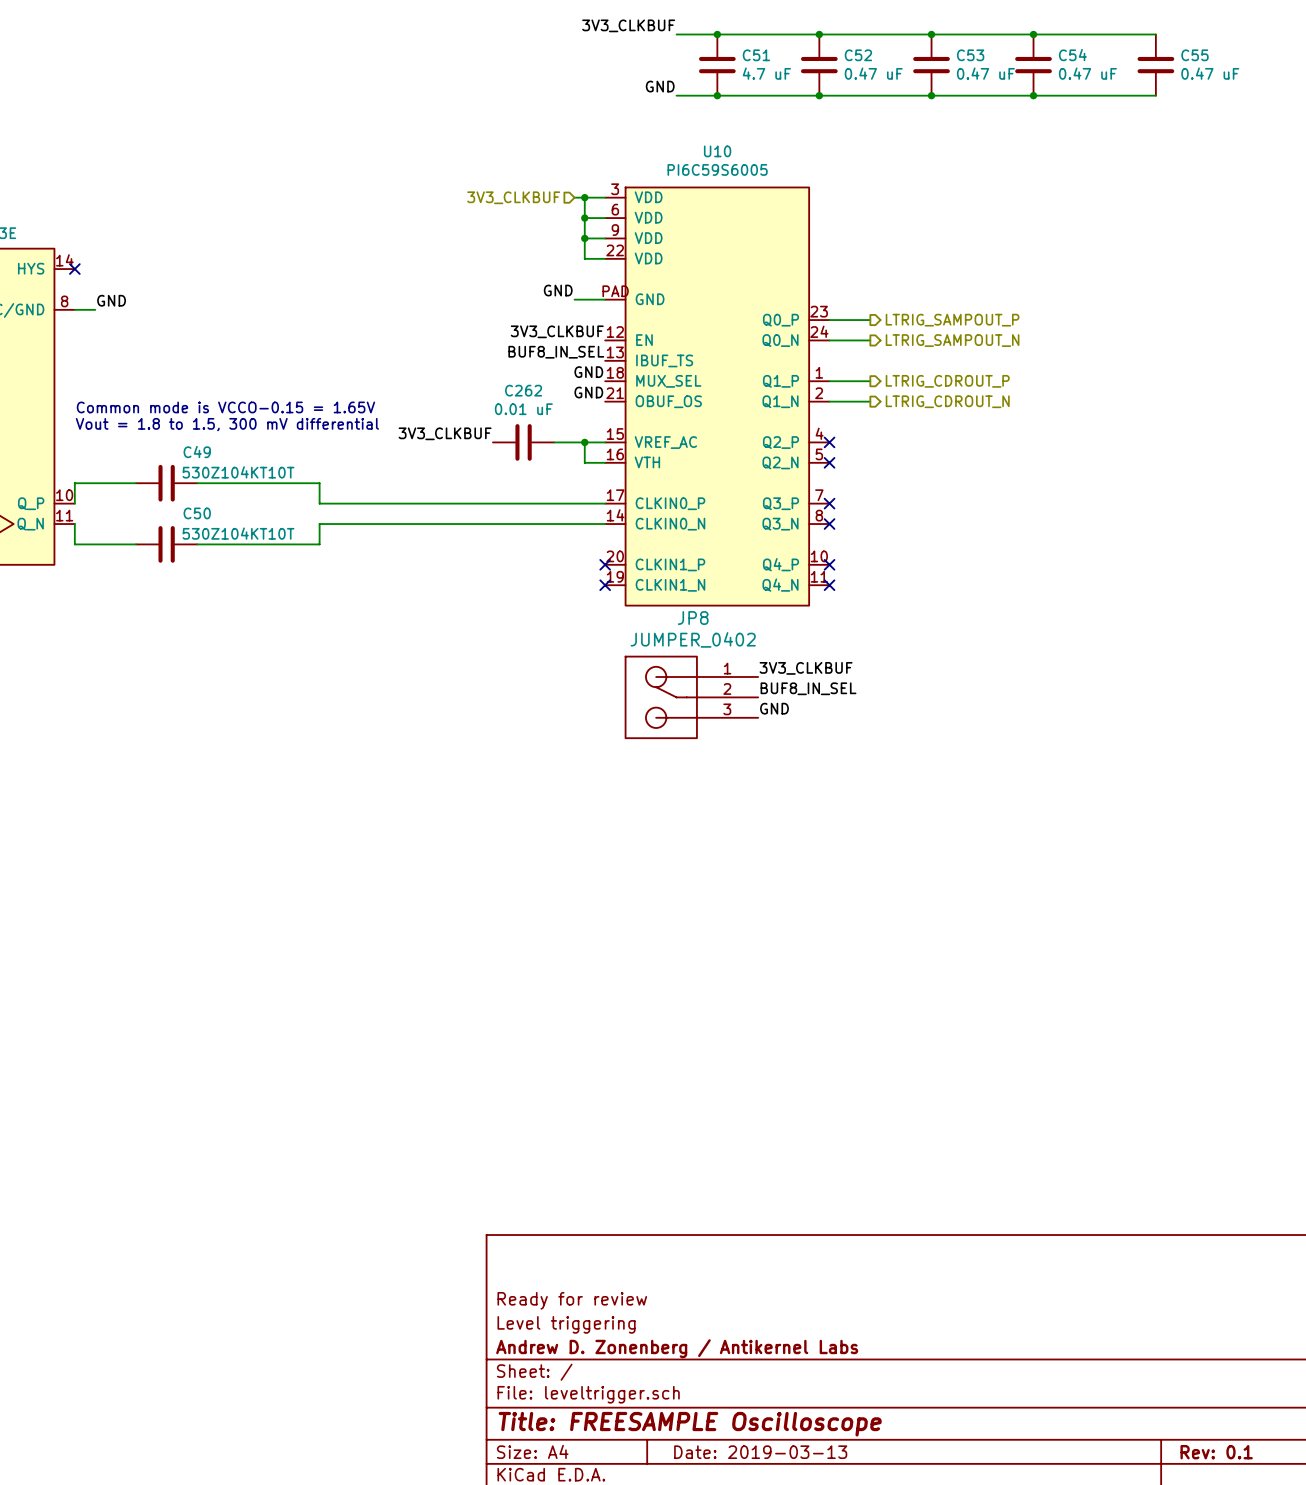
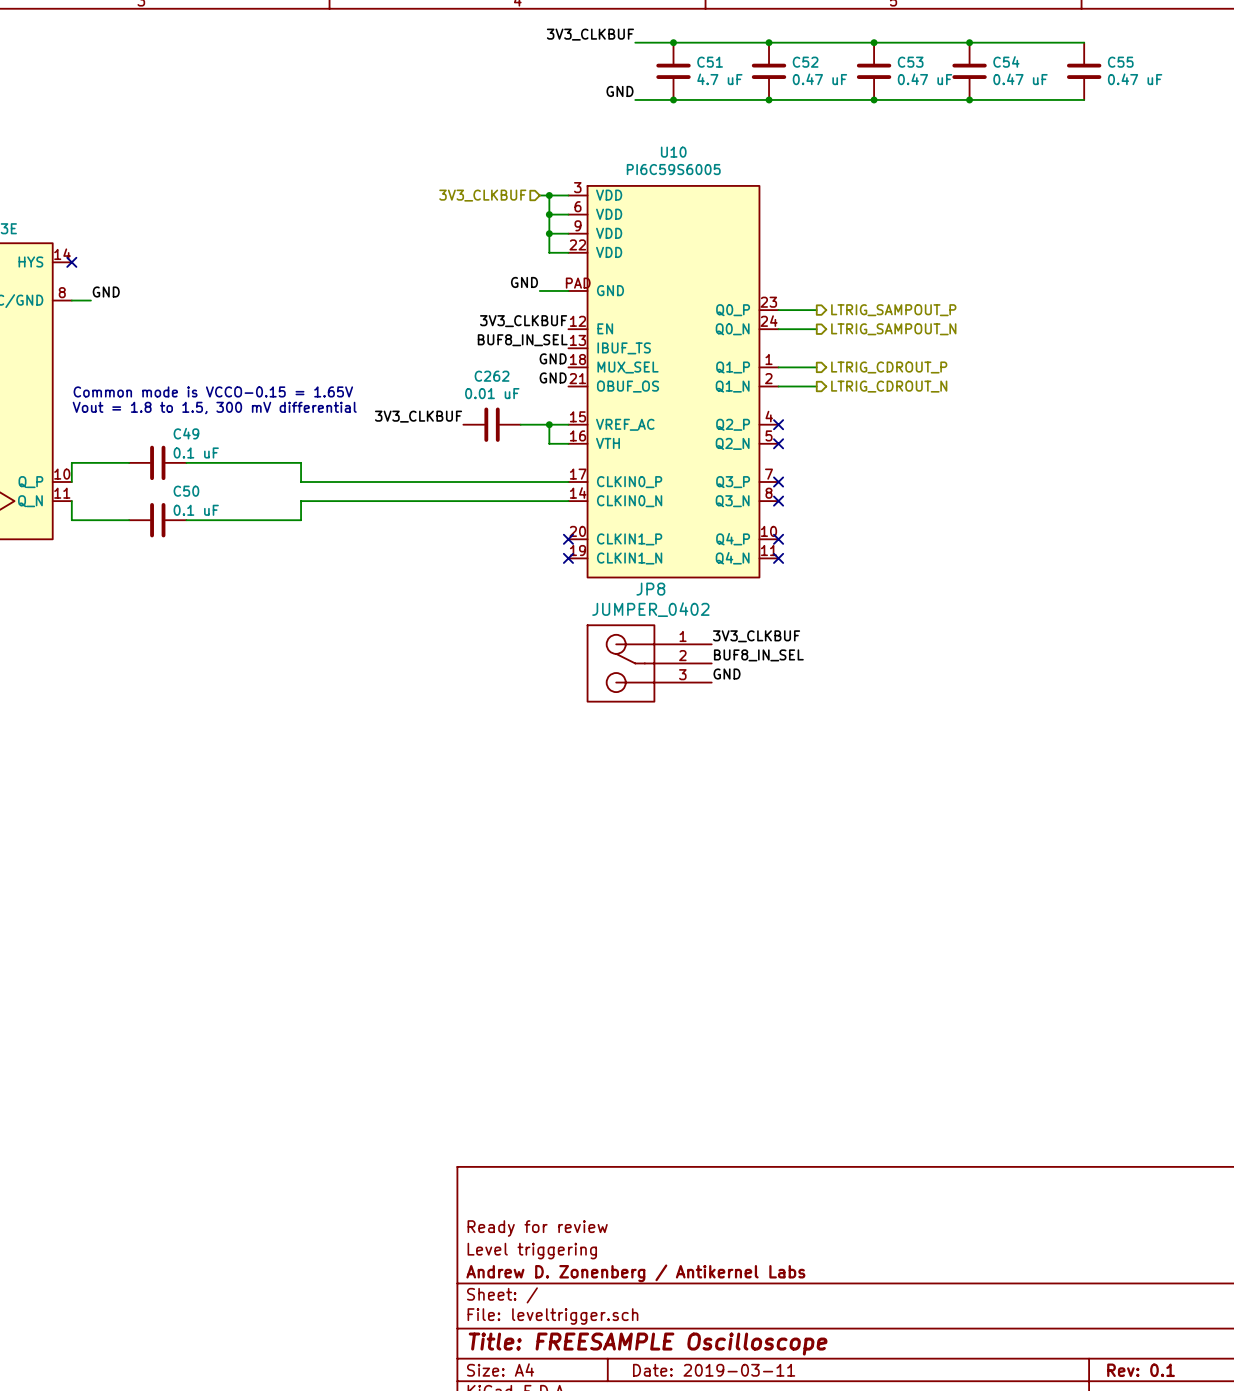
C49 value: 530Z104KT10T (238, 472) -> 0.1 uF (196, 452)
C50 value: 530Z104KT10T (238, 533) -> 0.1 uF (196, 510)
title block: Date: 2019-03-13 (760, 1452) -> Date: 2019-03-11 (714, 1370)

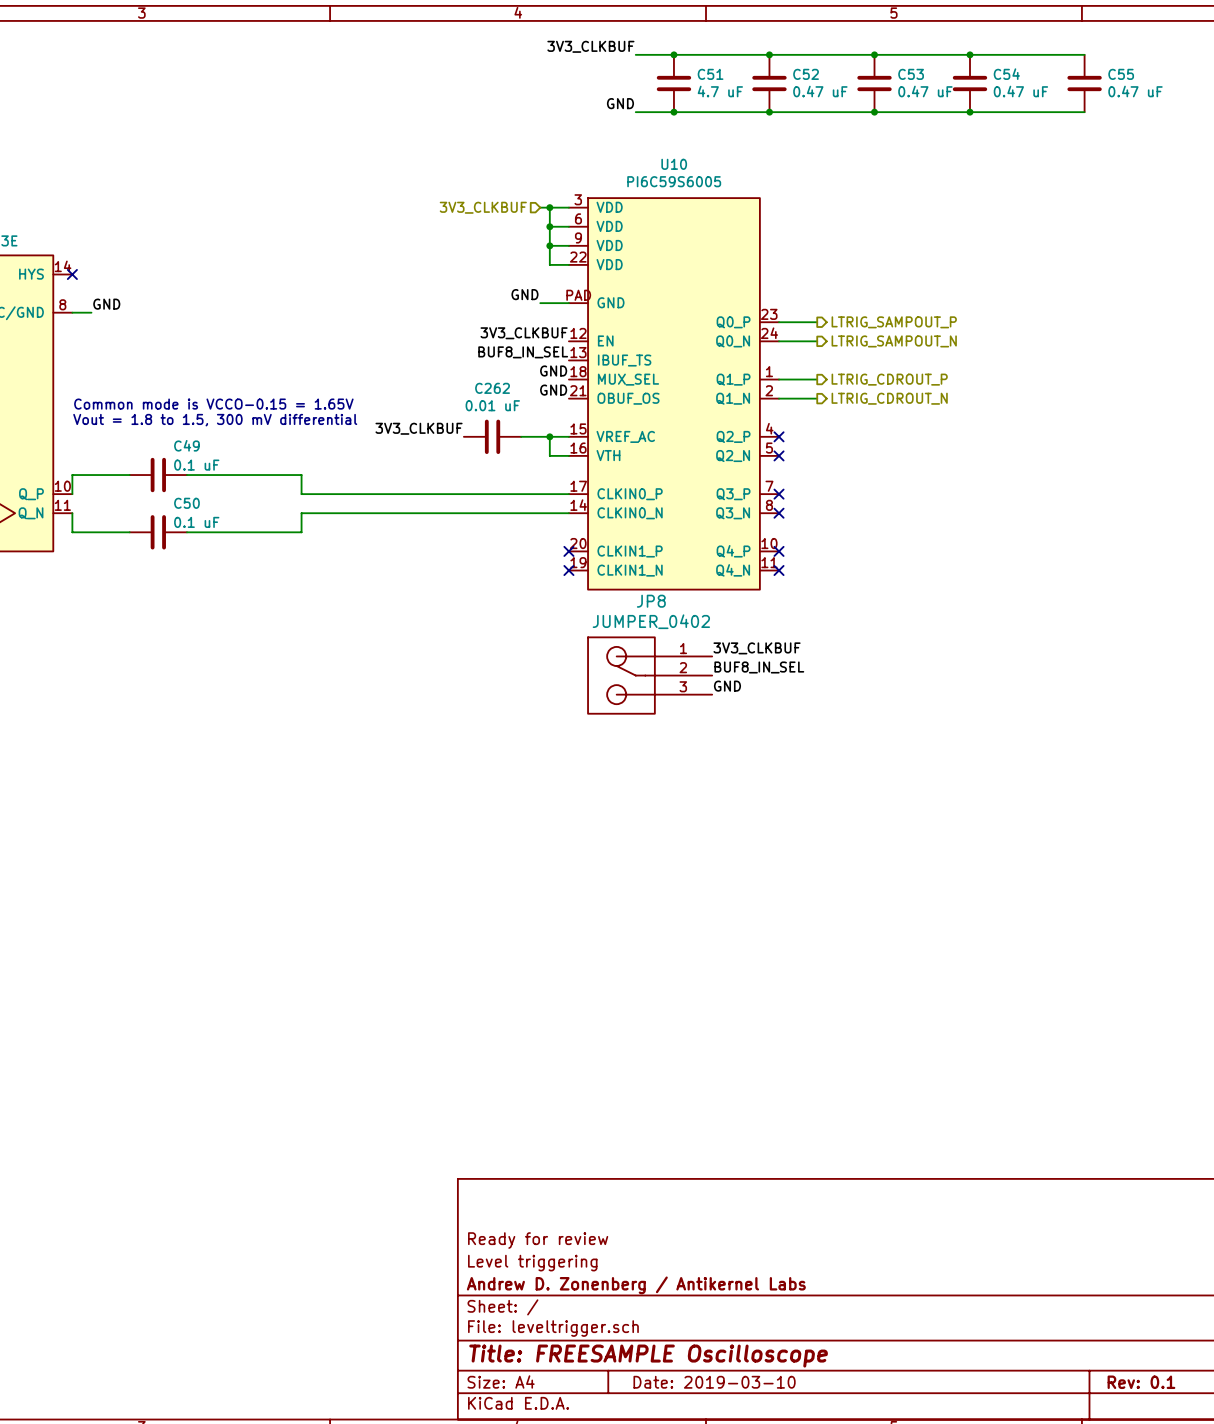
title block: Date: 2019-03-11 (714, 1370) -> Date: 2019-03-10 (714, 1382)

